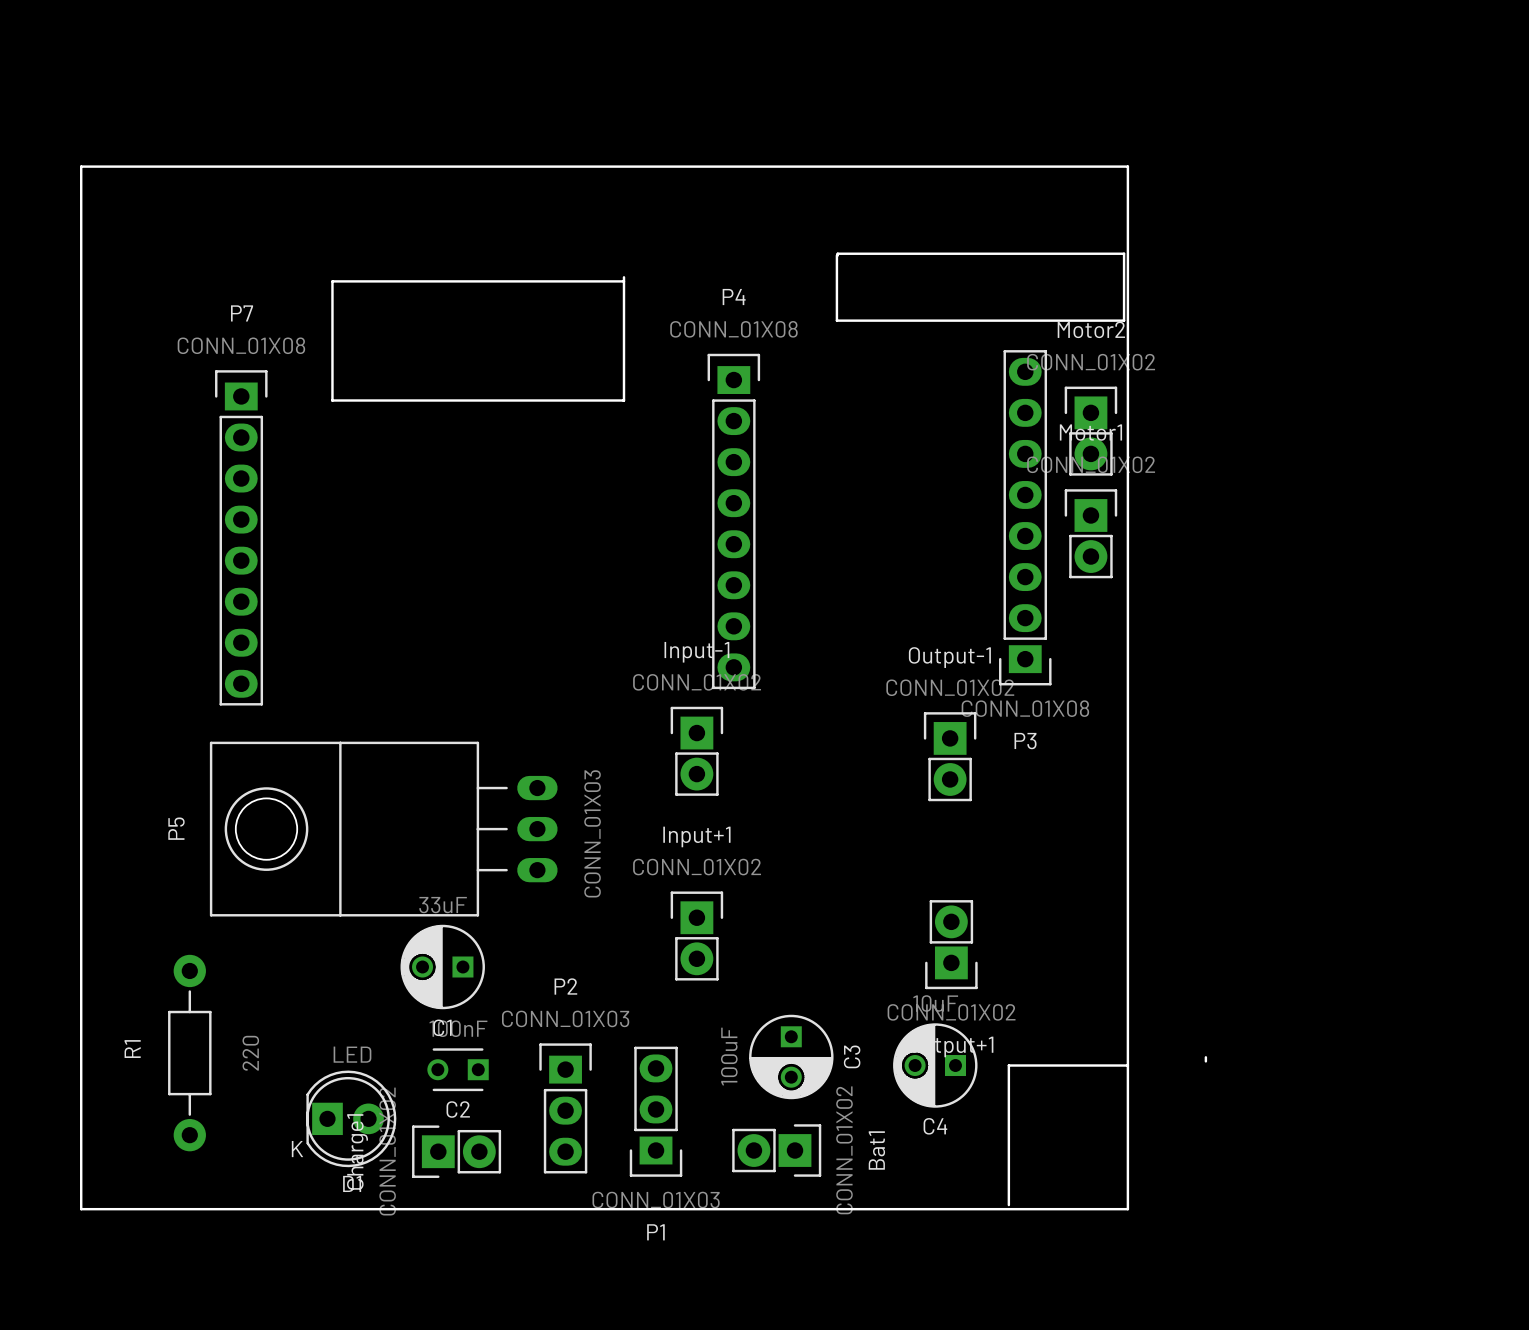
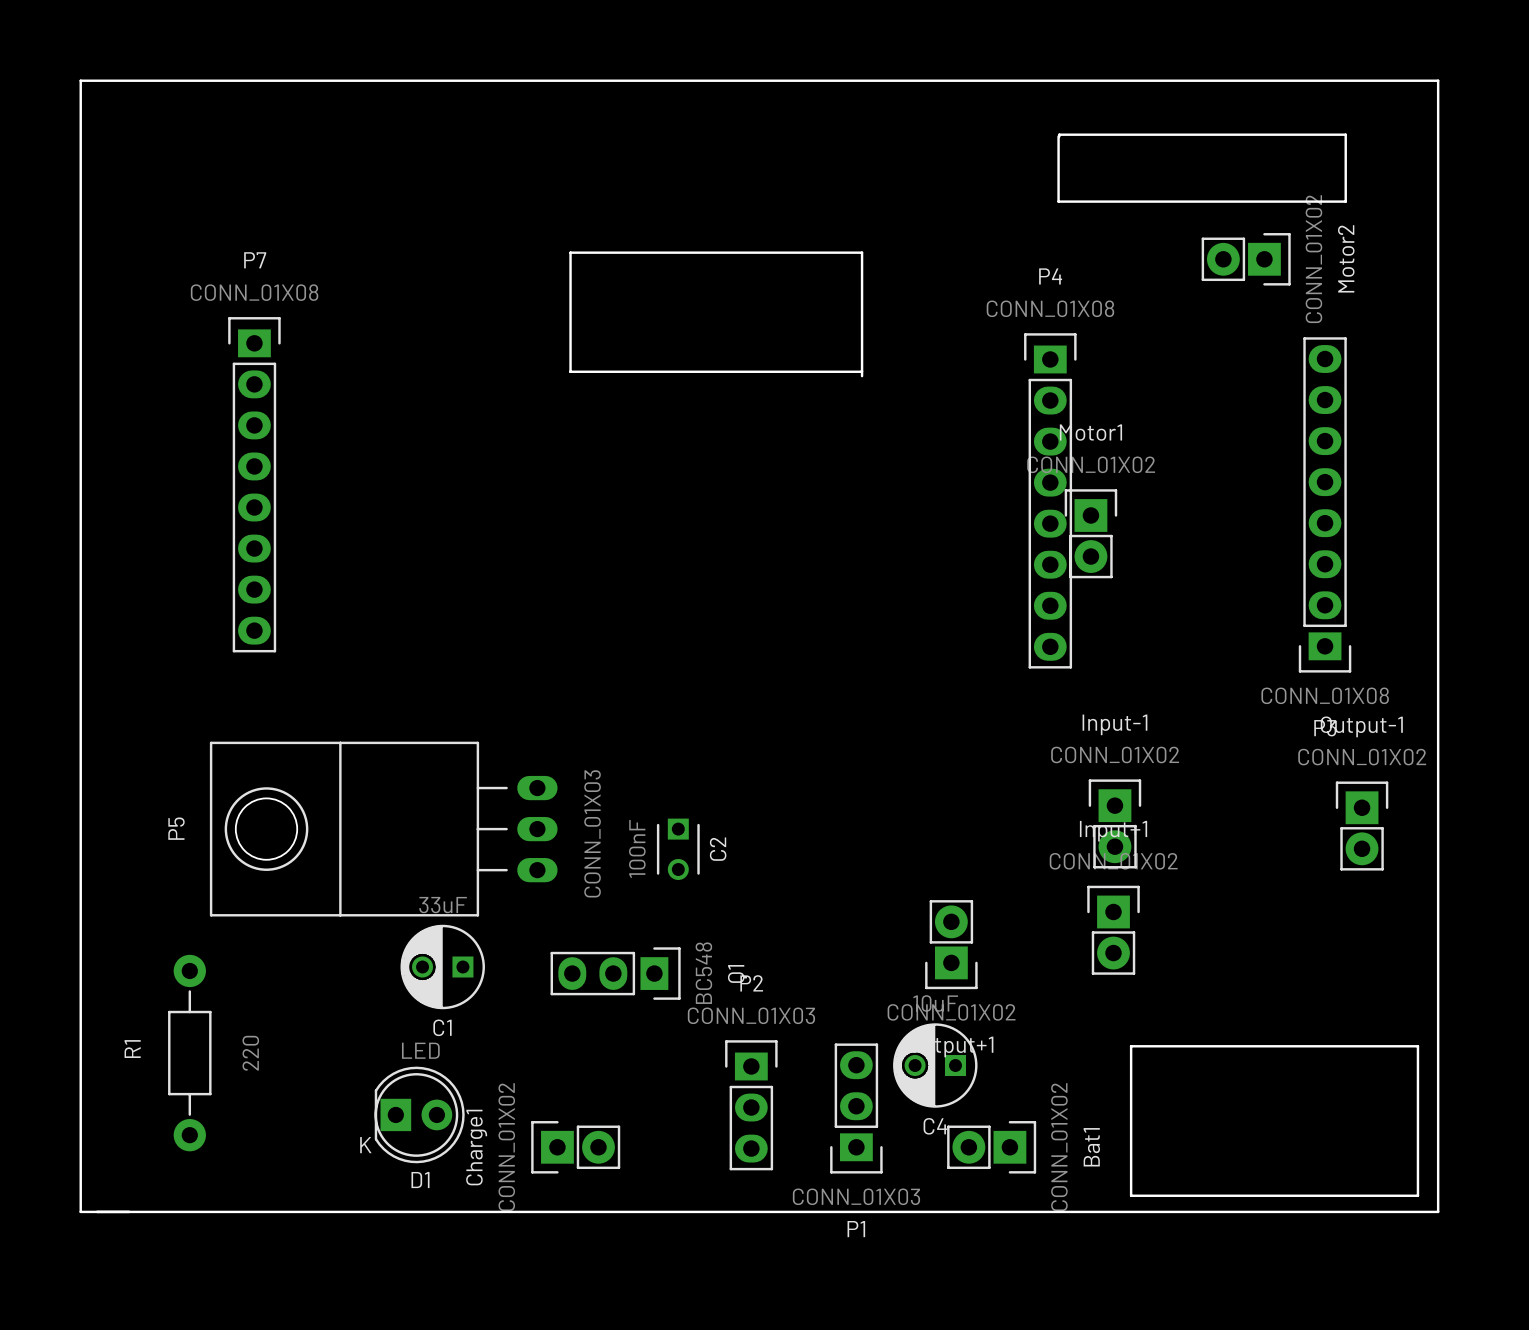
board edge: (81, 166) (81, 1209) (1127, 1209) (1127, 166) (81, 166) -> (80, 80) (80, 1211) (1438, 1211) (1438, 80) (80, 80)
board edge: (836, 255) (836, 320) (1124, 320) (1124, 253) (837, 253) (837, 255) -> (1058, 136) (1058, 201) (1345, 201) (1345, 134) (1059, 134) (1059, 136)
board edge: (623, 277) (623, 400) -> none
board edge: (623, 281) (332, 281) (332, 400) -> none
board edge: none -> (570, 371) (570, 252) (862, 252) (862, 376)
board edge: (623, 400) (332, 400) -> (862, 371) (570, 371)
Motor2 rotation: 0° (1090, 431) -> 90° clockwise (1246, 259)
Motor2 position: (1090, 431) -> (1246, 259)
P3 position: (1025, 517) -> (1325, 504)
P4 position: (733, 521) -> (1050, 500)
P7 position: (241, 537) -> (254, 484)
Input-1 position: (696, 751) -> (1114, 823)
Output-1 position: (950, 756) -> (1362, 826)
Input+1 position: (696, 936) -> (1113, 930)
Q1: none -> BC548 (615, 973)
board edge: none -> (1131, 1046) (1417, 1046) (1417, 1195) (1131, 1195) (1131, 1046)
C3: 100uF (791, 1056) -> none
board edge: (1205, 1057) (1205, 1061) -> none
board edge: (1127, 1065) (1008, 1065) (1008, 1205) -> none
C2 rotation: 0° (458, 1069) -> 90° counterclockwise (678, 849)
C2 position: (458, 1069) -> (678, 849)
P2 position: (565, 1108) -> (751, 1105)
P1 position: (656, 1111) -> (856, 1108)
D1 position: (351, 1118) -> (419, 1114)
Bat1 position: (776, 1150) -> (991, 1147)
Charge1 position: (456, 1151) -> (575, 1147)

